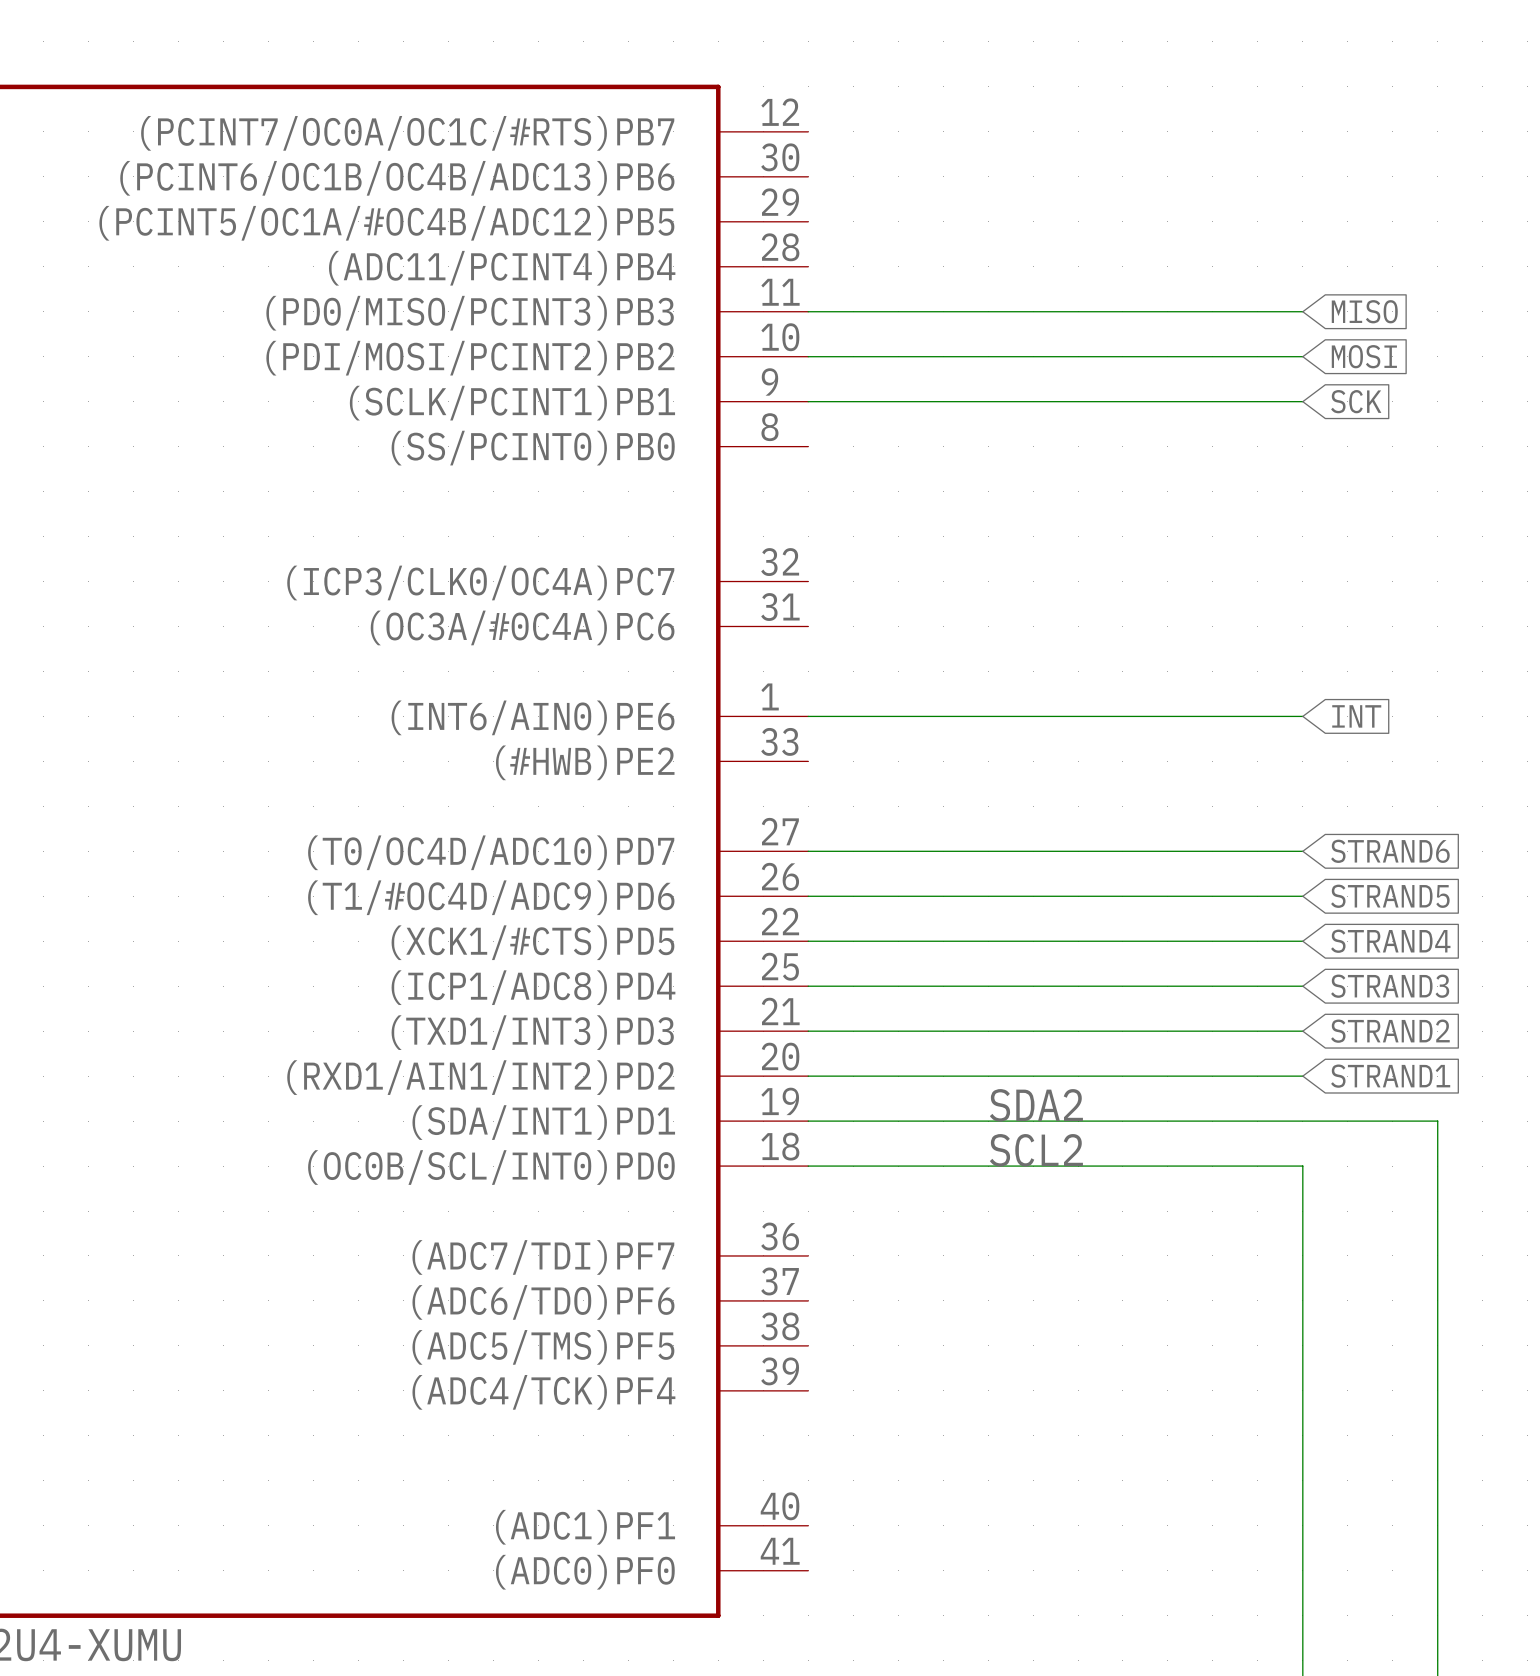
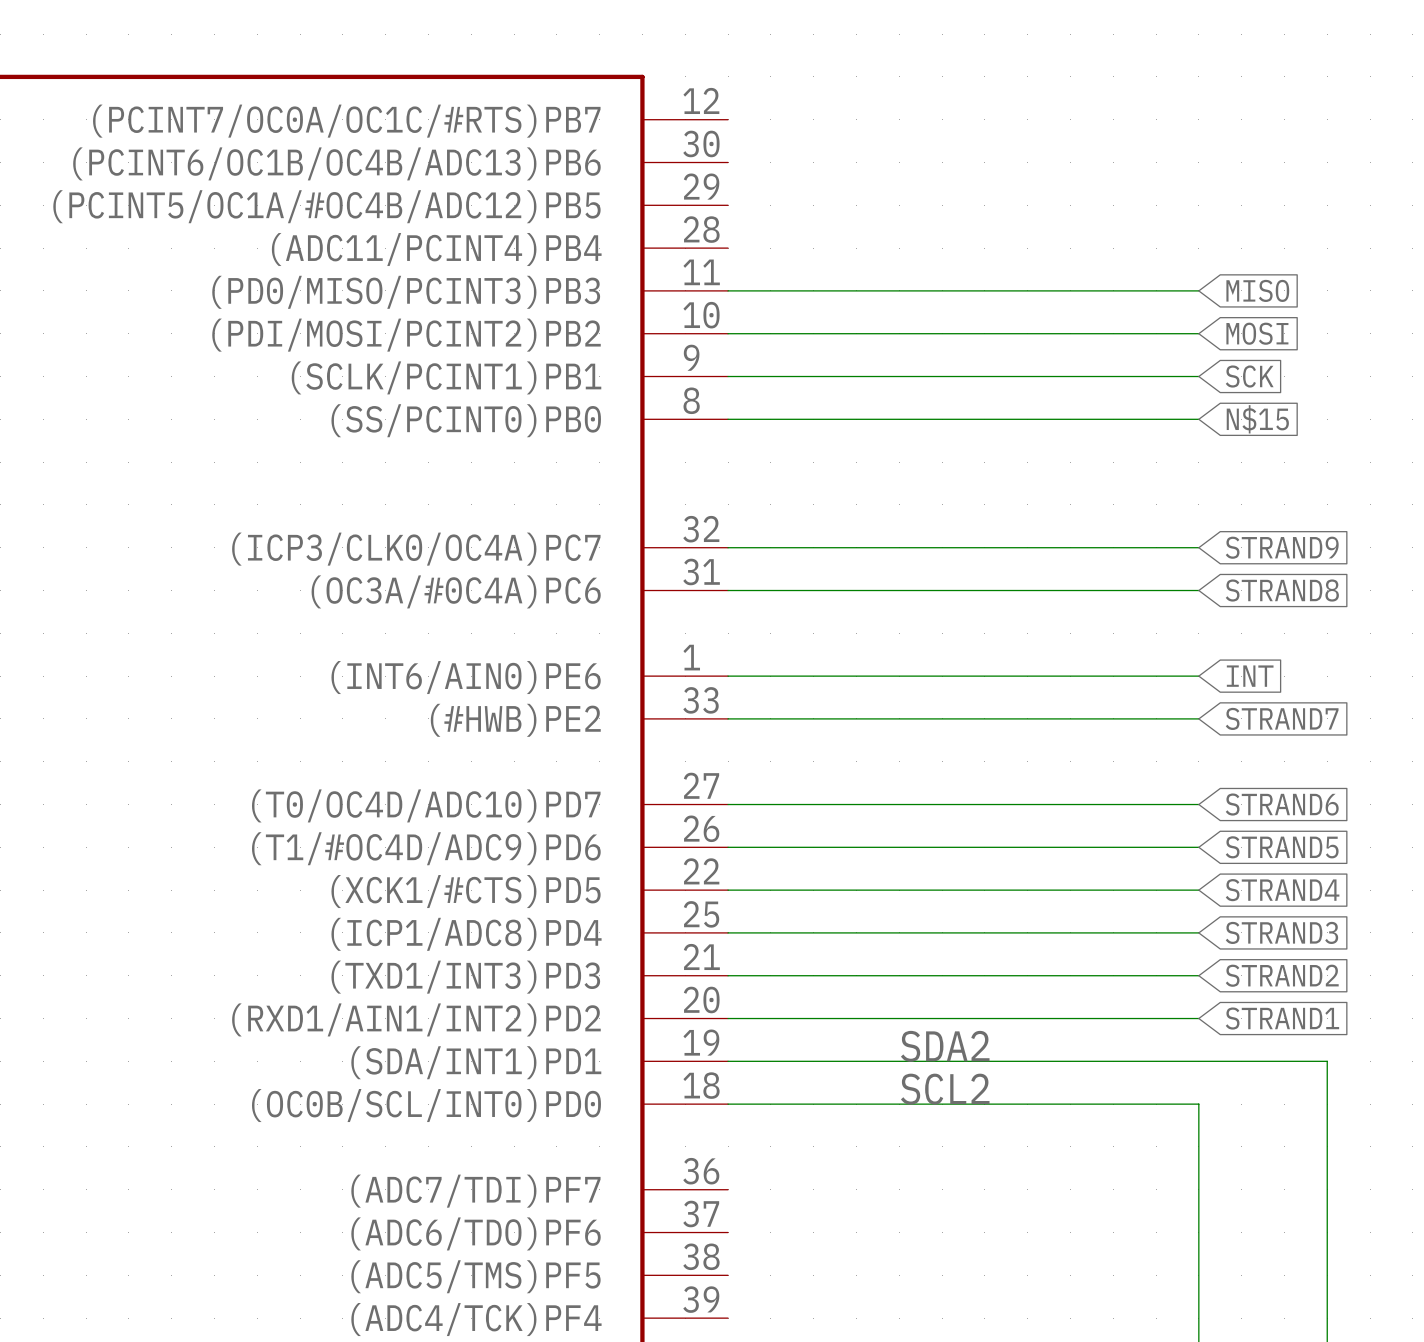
wire: none -> (728, 419) (1198, 419)
global label: none -> N$15 (1257, 419)
wire: none -> (728, 547) (1198, 547)
global label: none -> STRAND9 (1282, 547)
wire: none -> (728, 590) (1198, 590)
global label: none -> STRAND8 (1282, 590)
wire: none -> (728, 718) (1198, 718)
global label: none -> STRAND7 (1282, 718)

